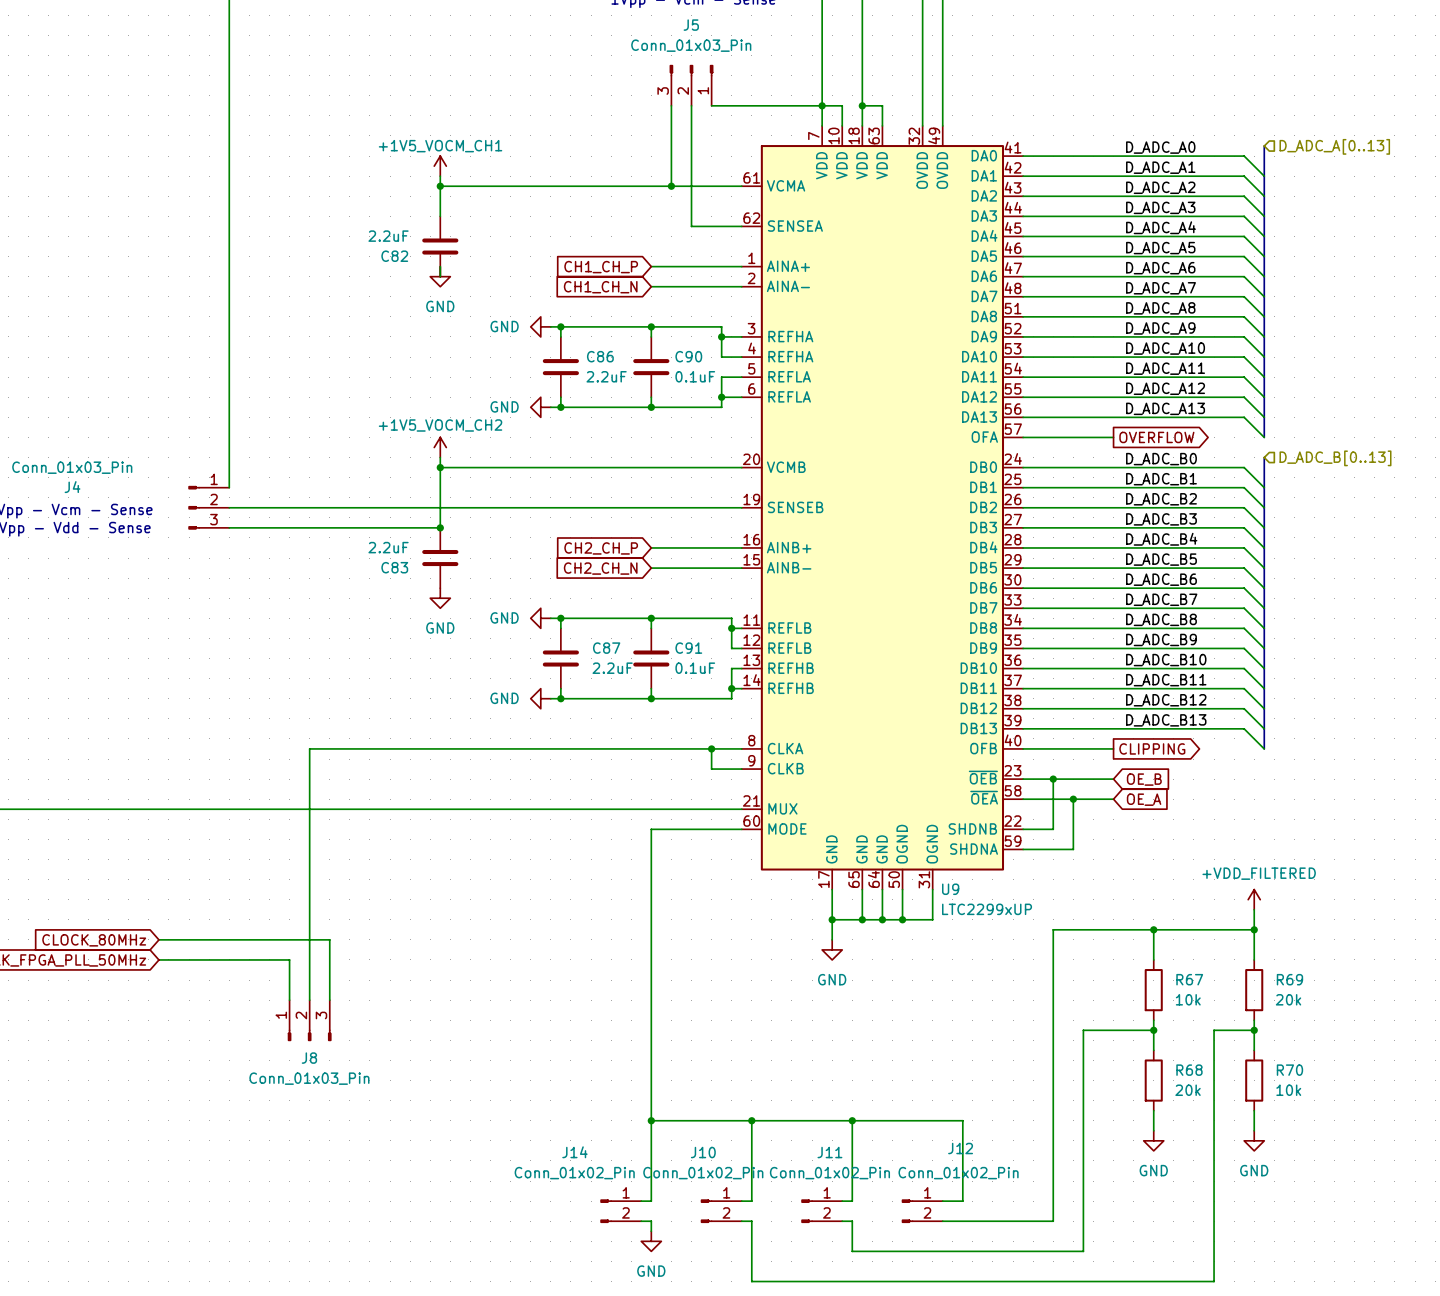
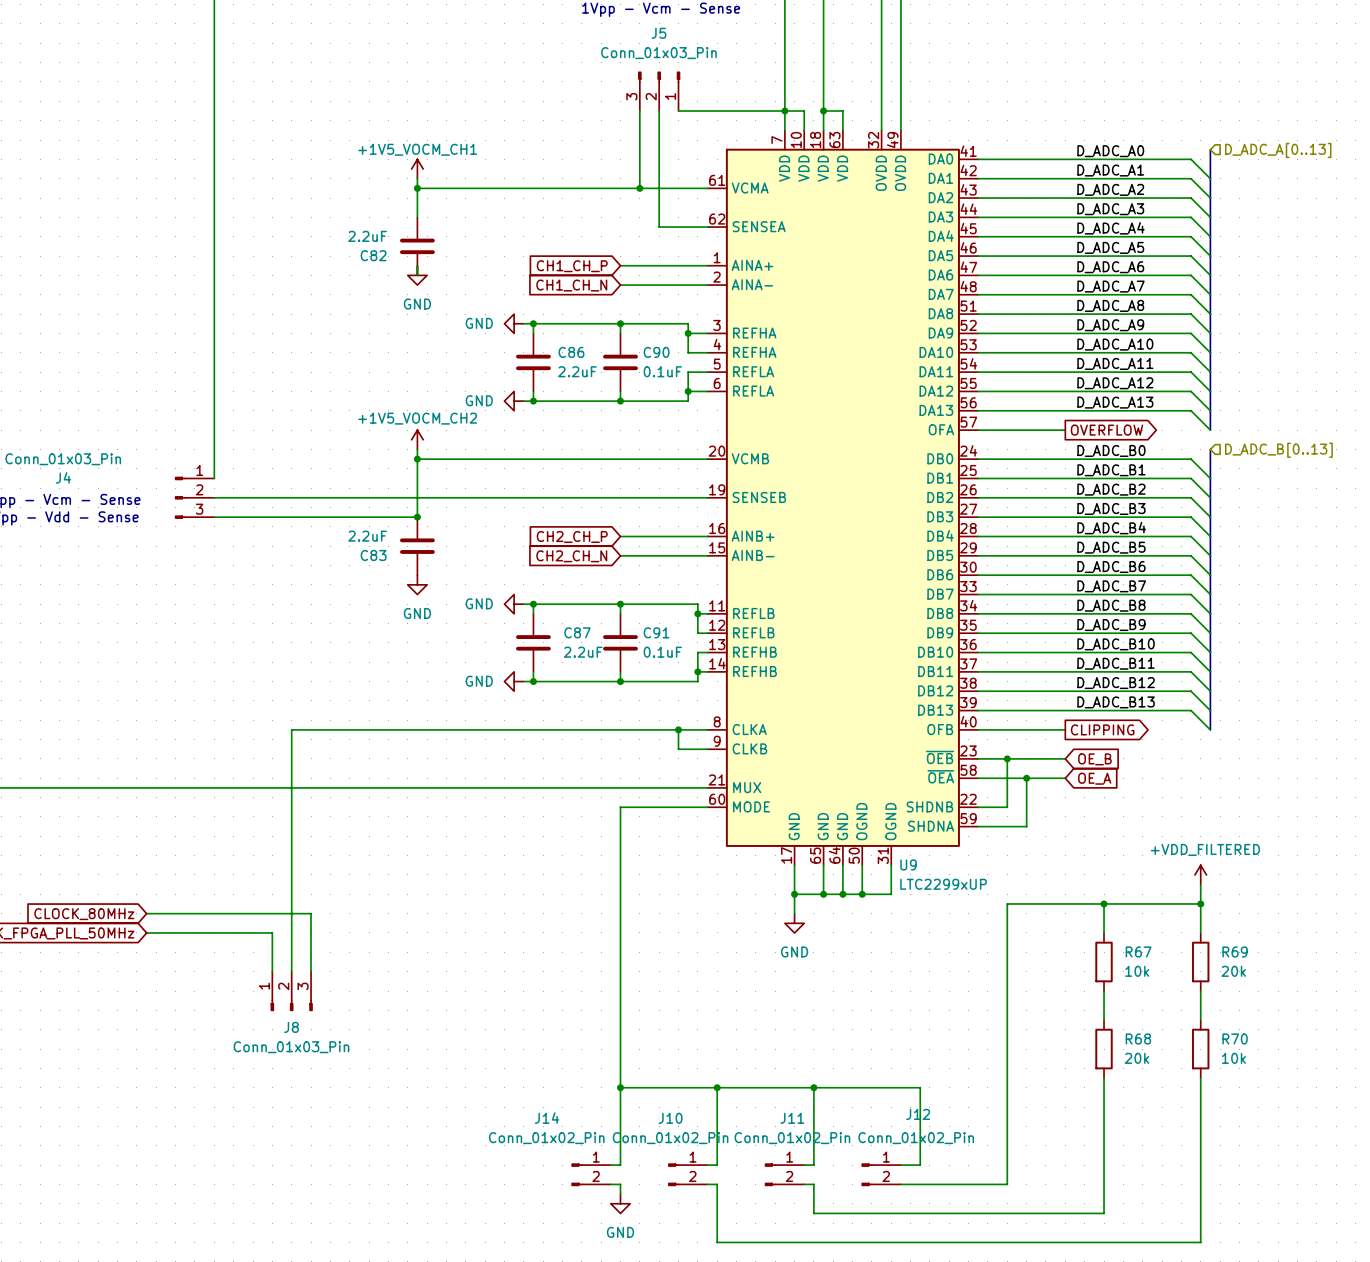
wire: (1153, 1030) (1083, 1030) (1083, 1251) -> (1104, 1097) (1104, 1213) (1036, 1213)
junction: (1153, 1030) -> none
wire: (1254, 1030) (1214, 1030) (1214, 1281) -> (1200, 1097) (1200, 1242) (1162, 1242)
junction: (1254, 1030) -> none
power symbol: GND (1153, 1140) -> none
power symbol: GND (1254, 1140) -> none

